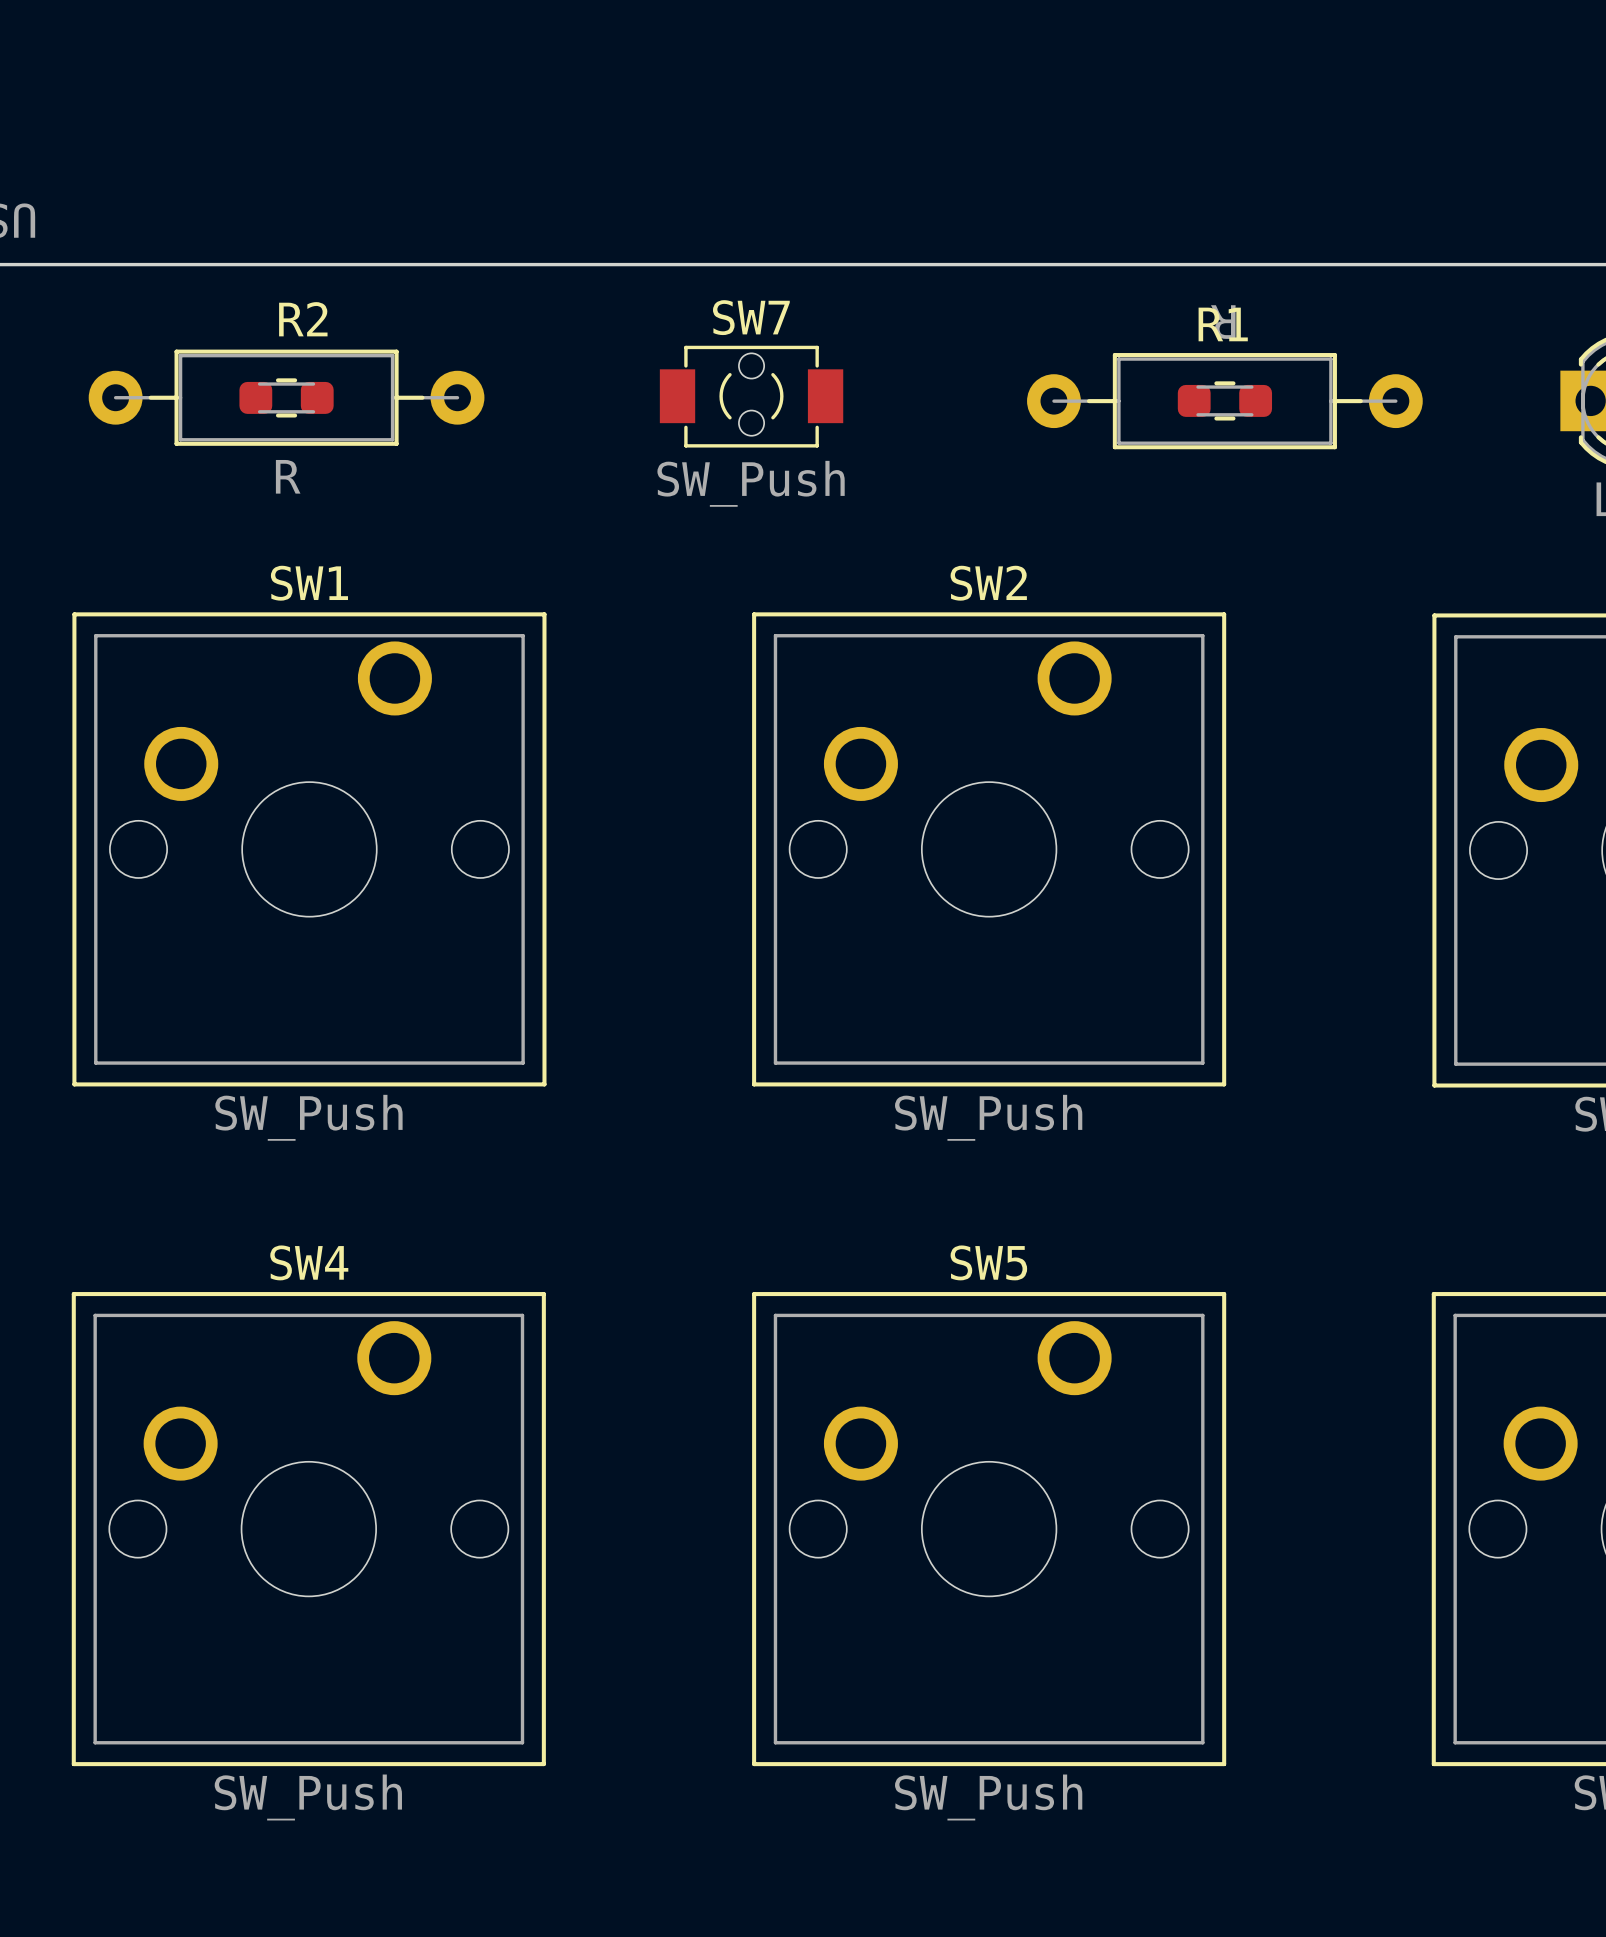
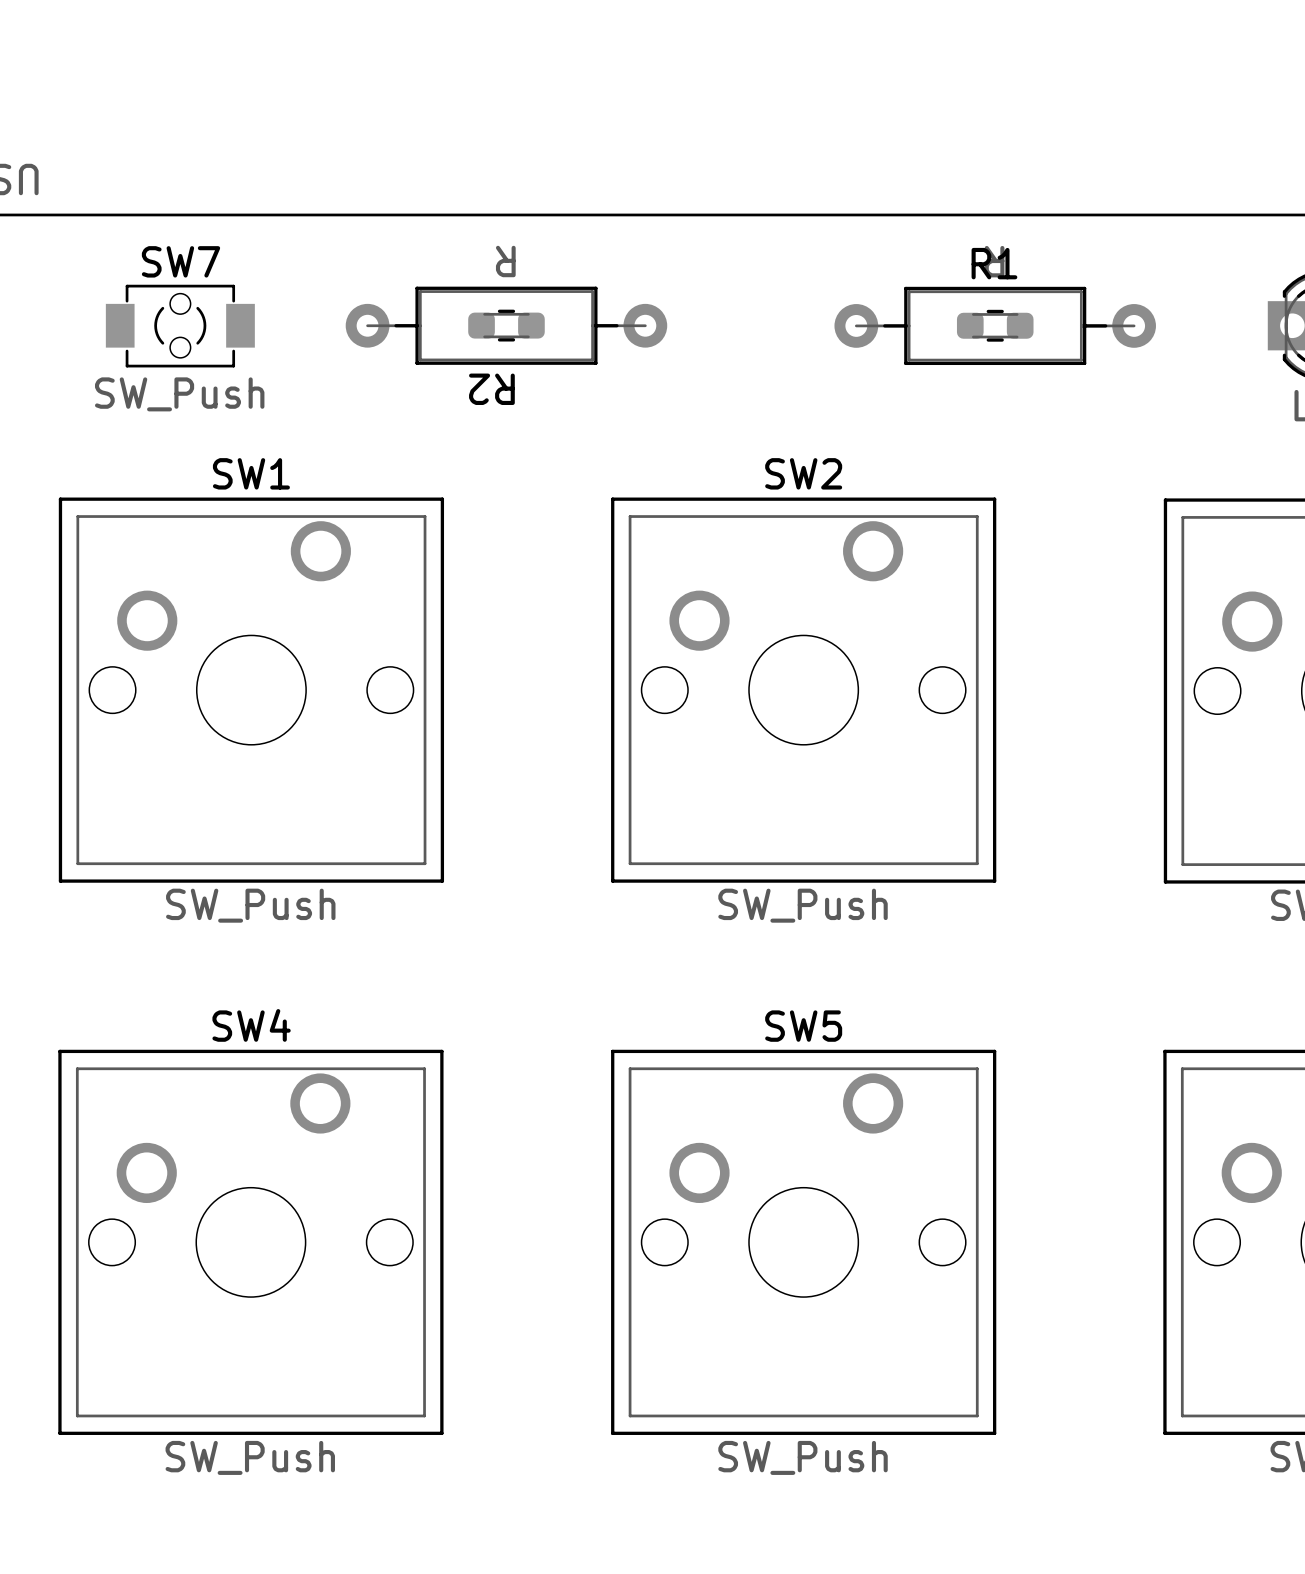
R2 name rotation: 0° (303, 319) -> 180° (491, 389)
R2 name position: R2 (303, 319) -> R2 (491, 389)
SW7 footprint: [659, 345, 844, 448] -> [105, 284, 255, 368]
R2 position: (286, 397) -> (506, 325)
R2 value rotation: 0° (288, 476) -> 180° (505, 261)
R2 value position: R (288, 476) -> R (505, 261)

